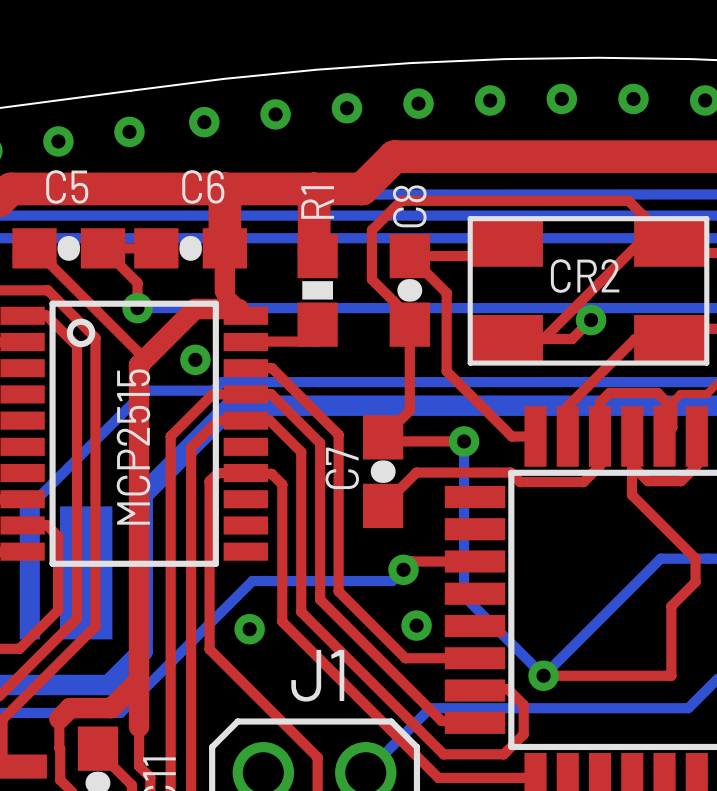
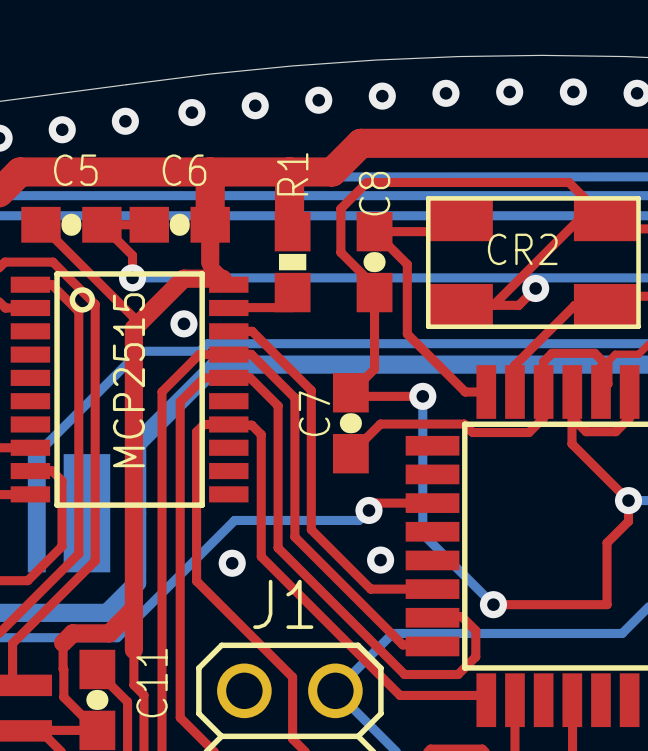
bottom track: (695, 558) (660, 558) (543, 675) -> none
via: none -> (628, 500)

